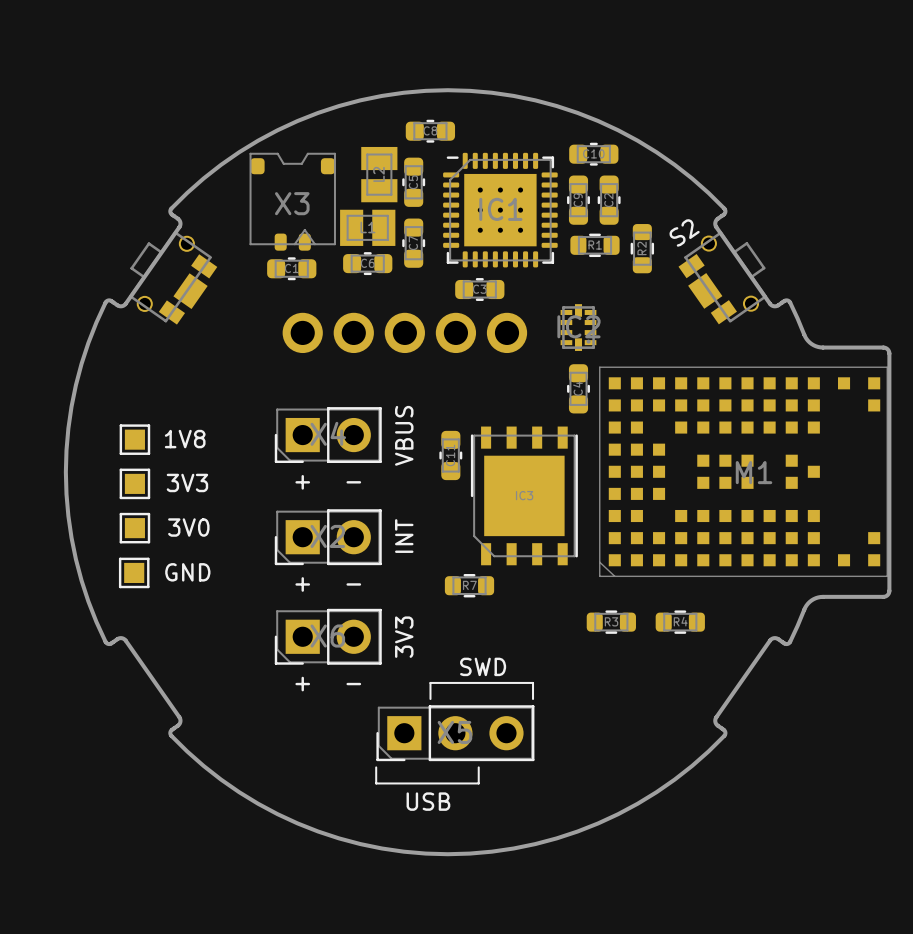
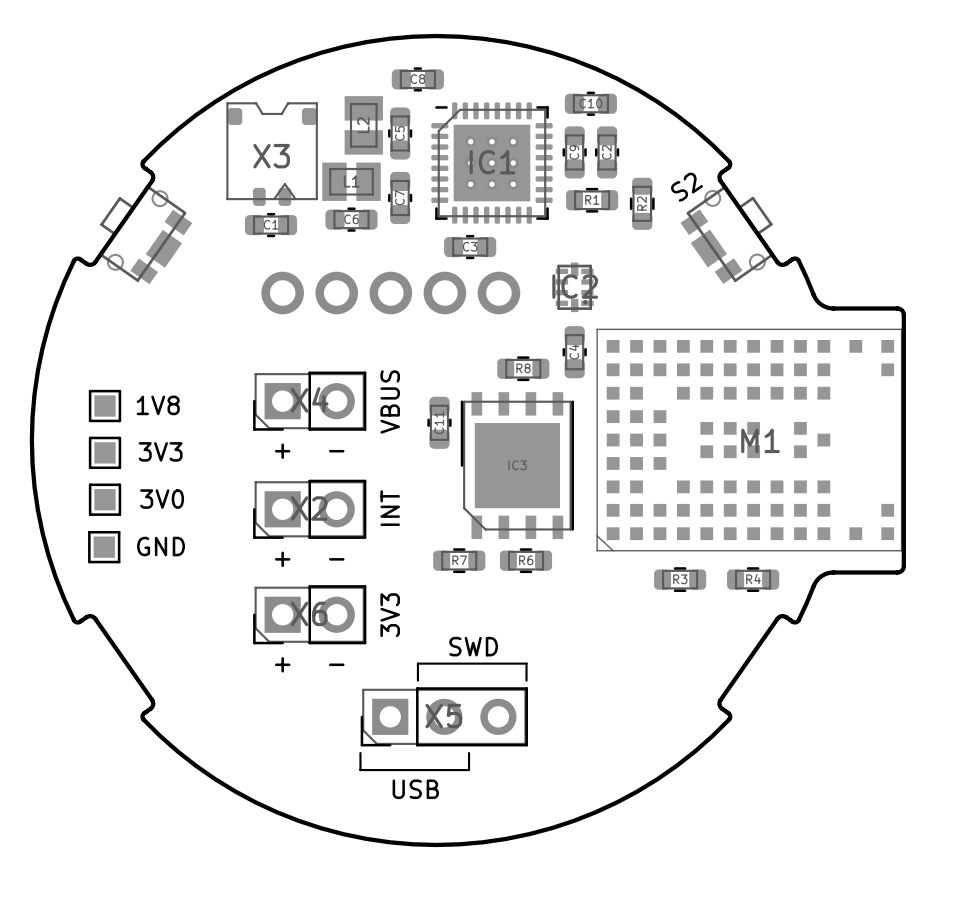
R8: none -> (523, 368)
R6: none -> (526, 560)
R3 position: (611, 622) -> (680, 579)
R4 position: (680, 622) -> (753, 579)

